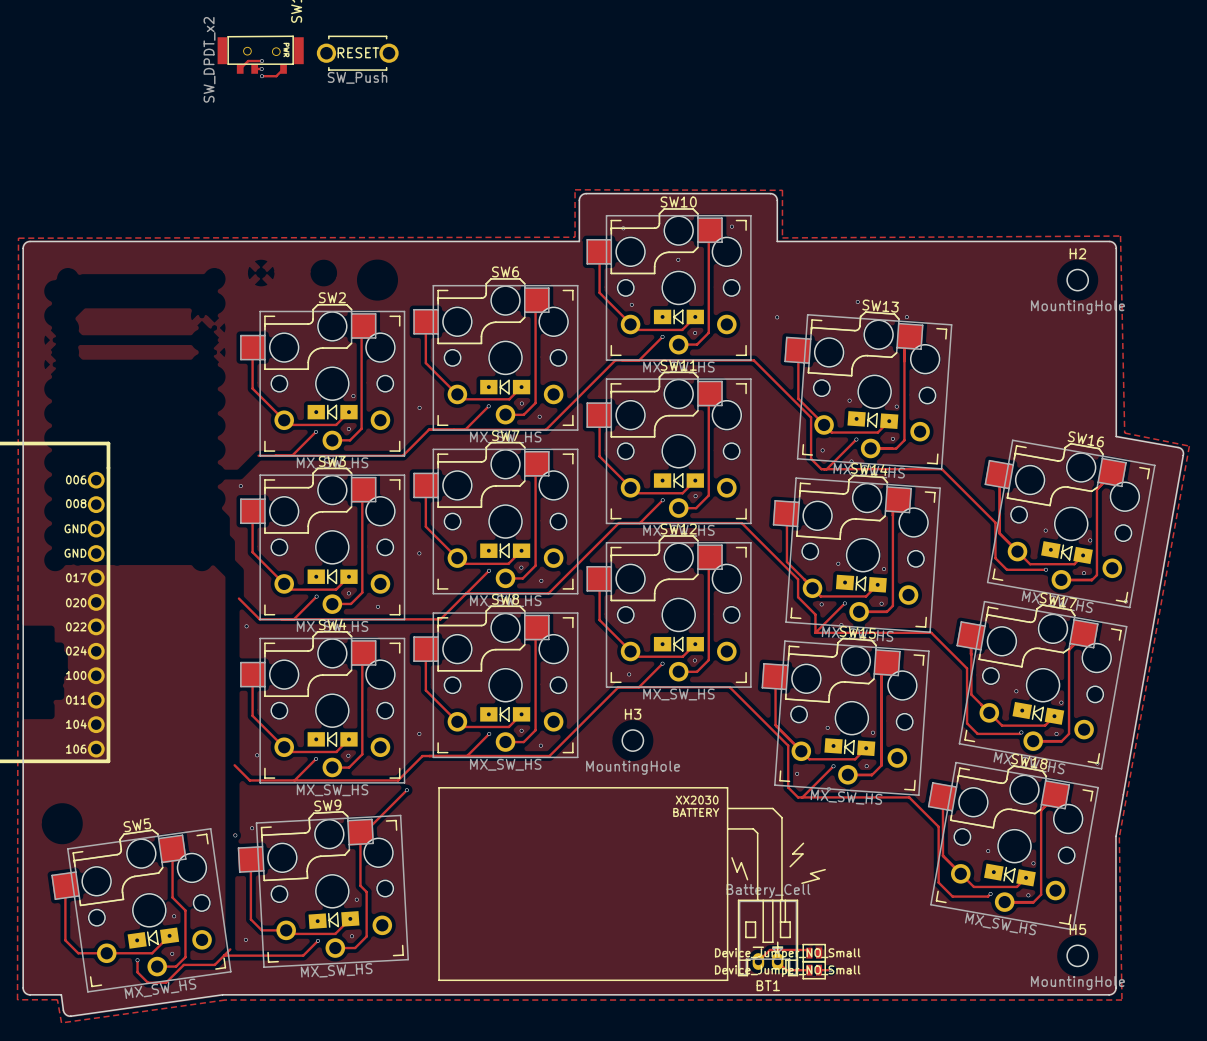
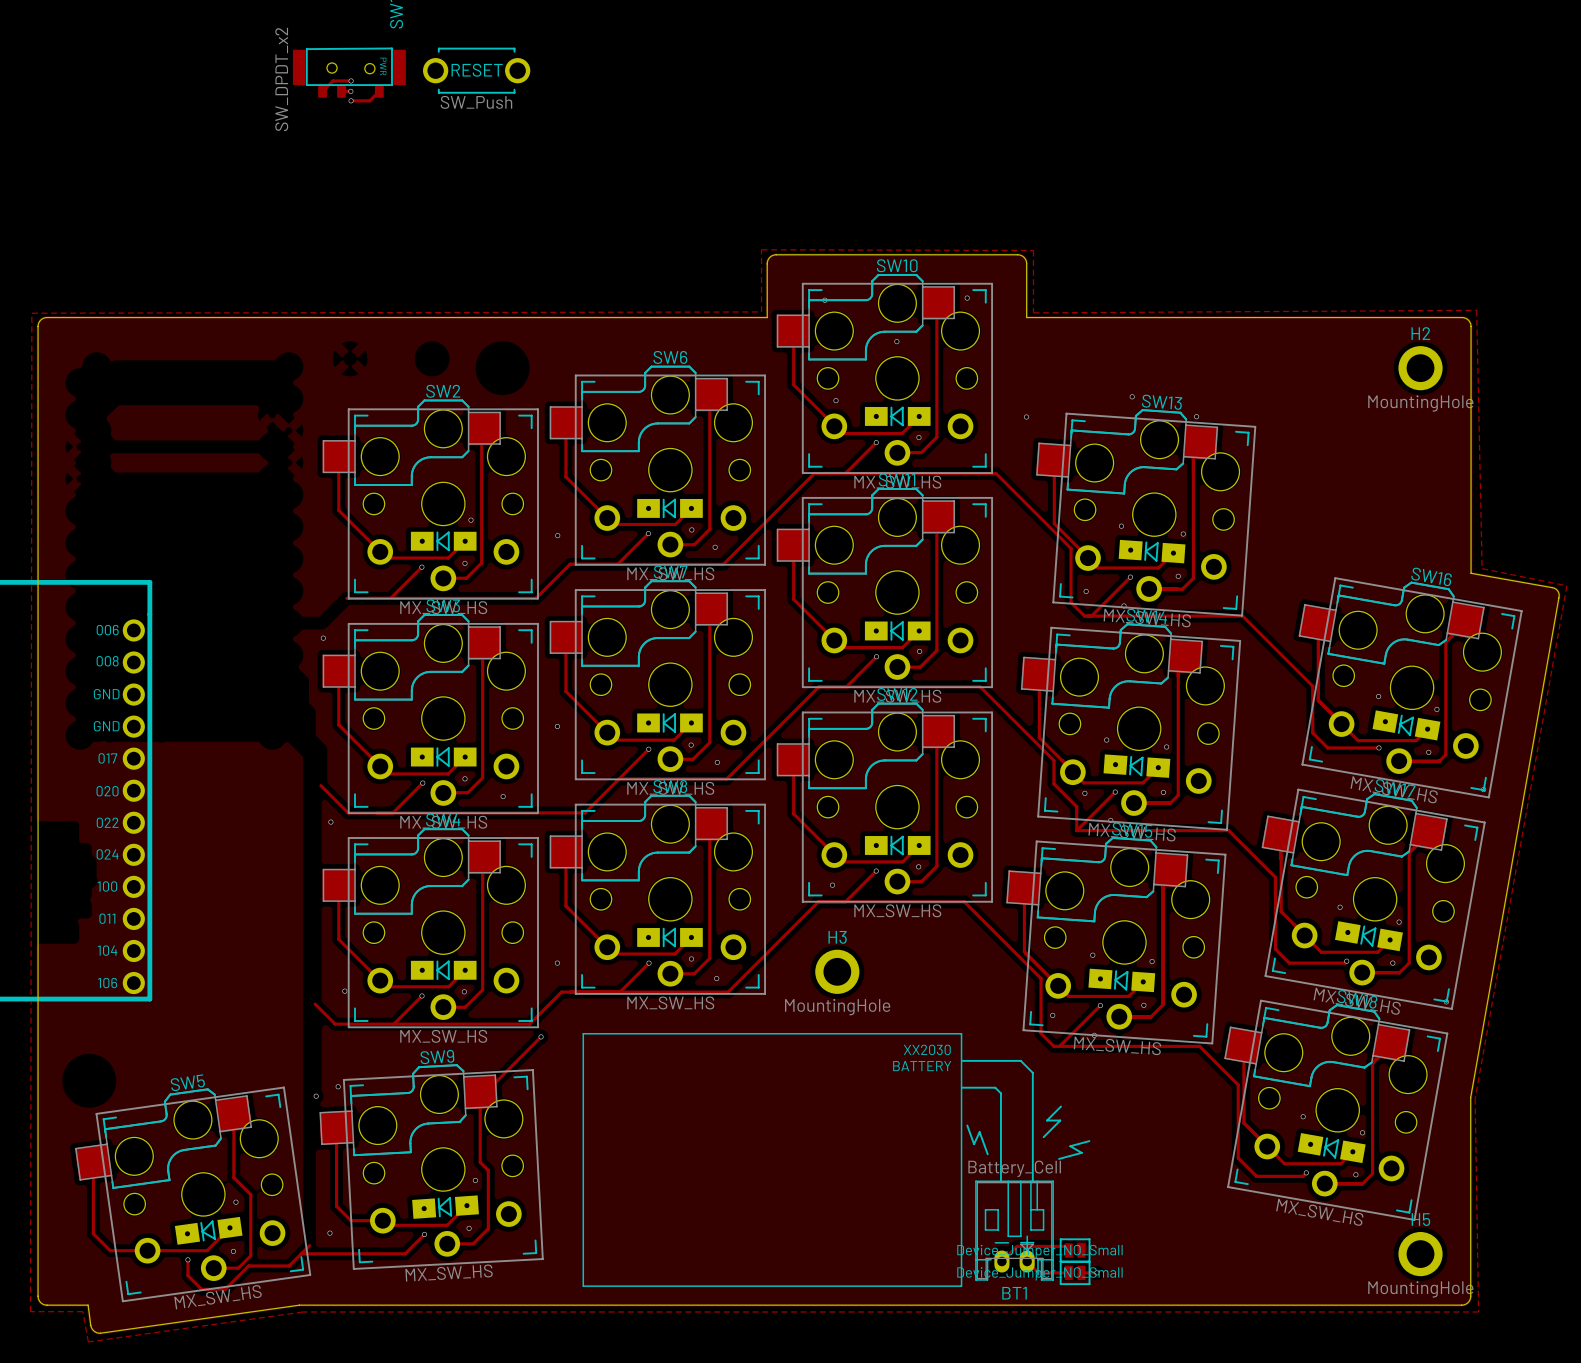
H2 footprint: [1067, 269, 1089, 291] -> [1398, 346, 1443, 391]
H3 footprint: [622, 729, 644, 752] -> [815, 949, 860, 994]
H5 footprint: [1067, 945, 1089, 967] -> [1398, 1231, 1443, 1277]

